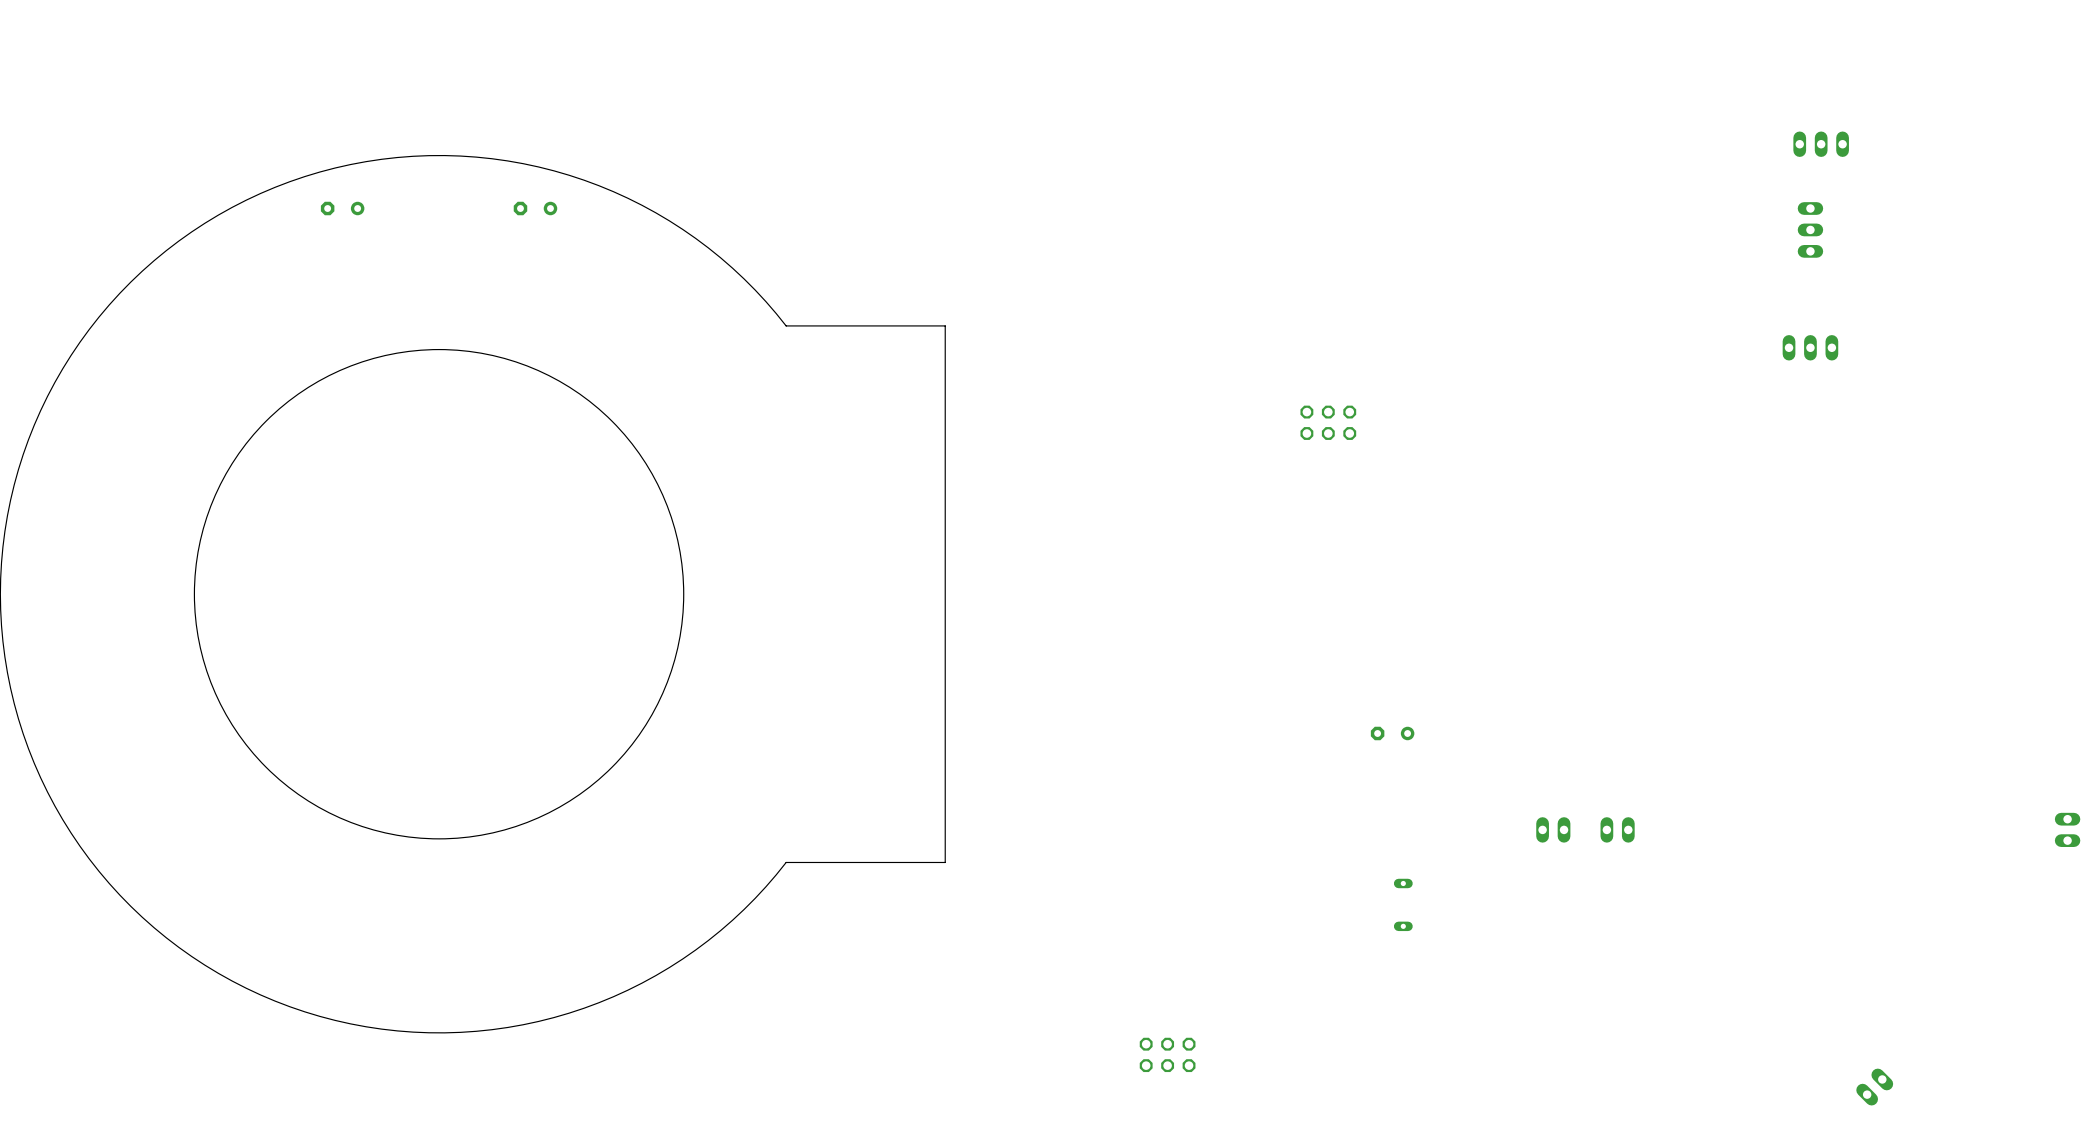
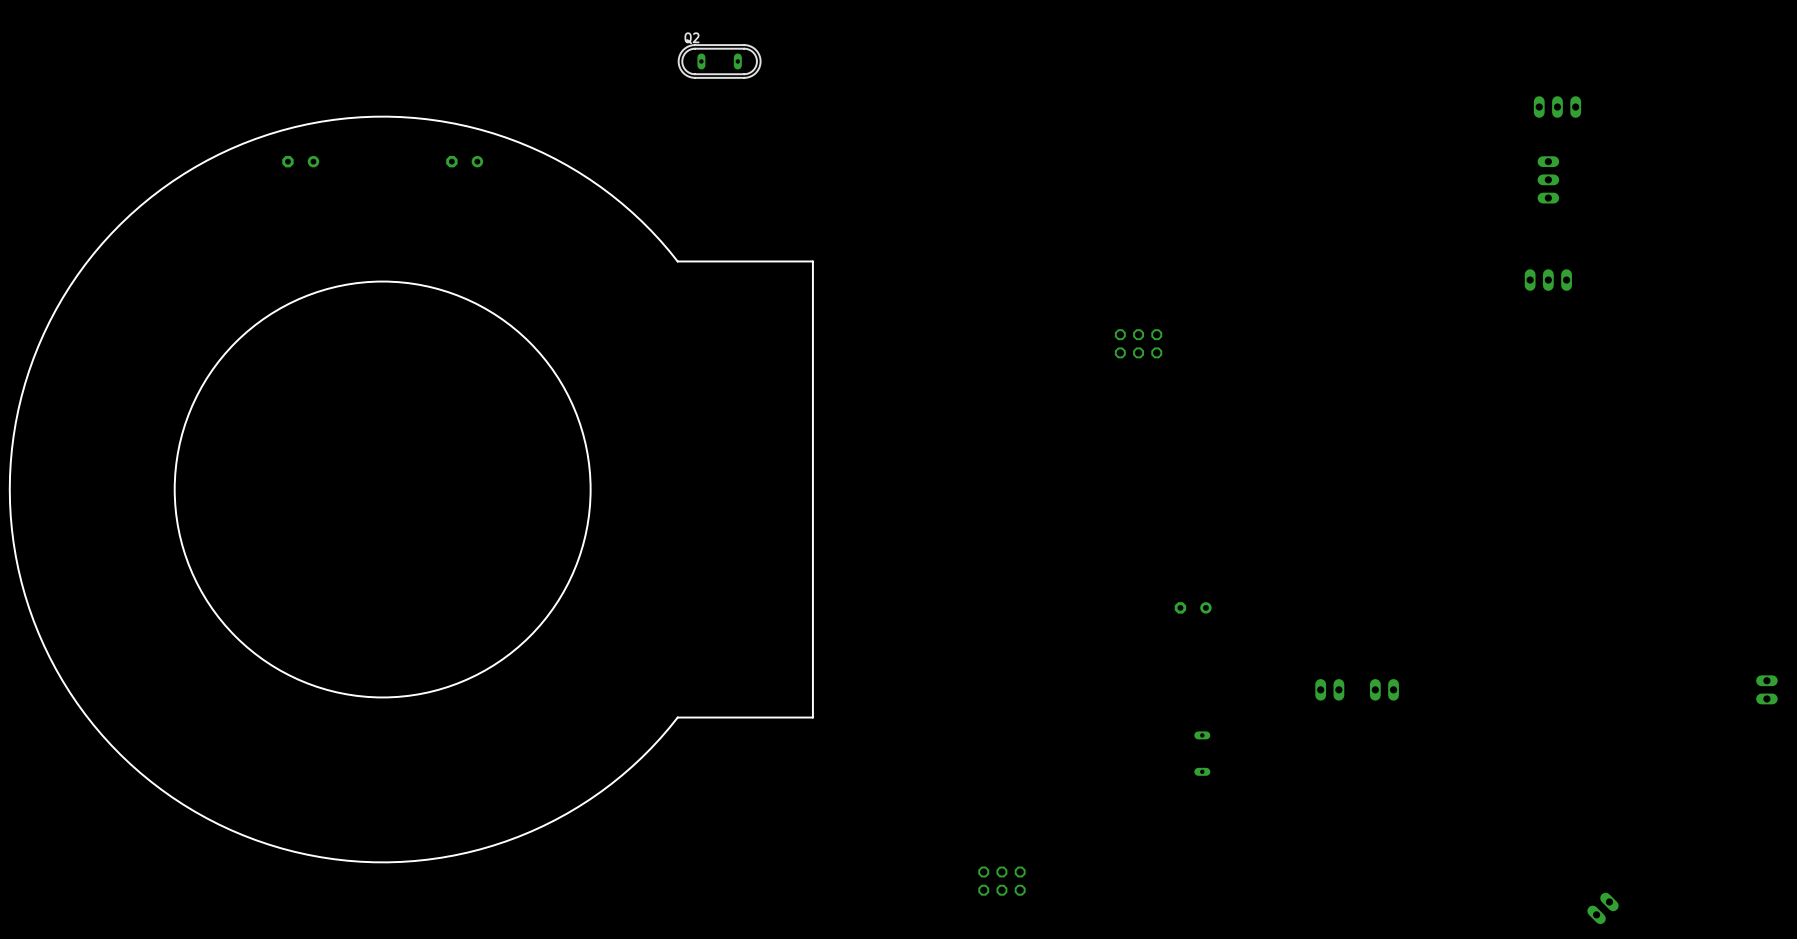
Q2: none -> (719, 61)

